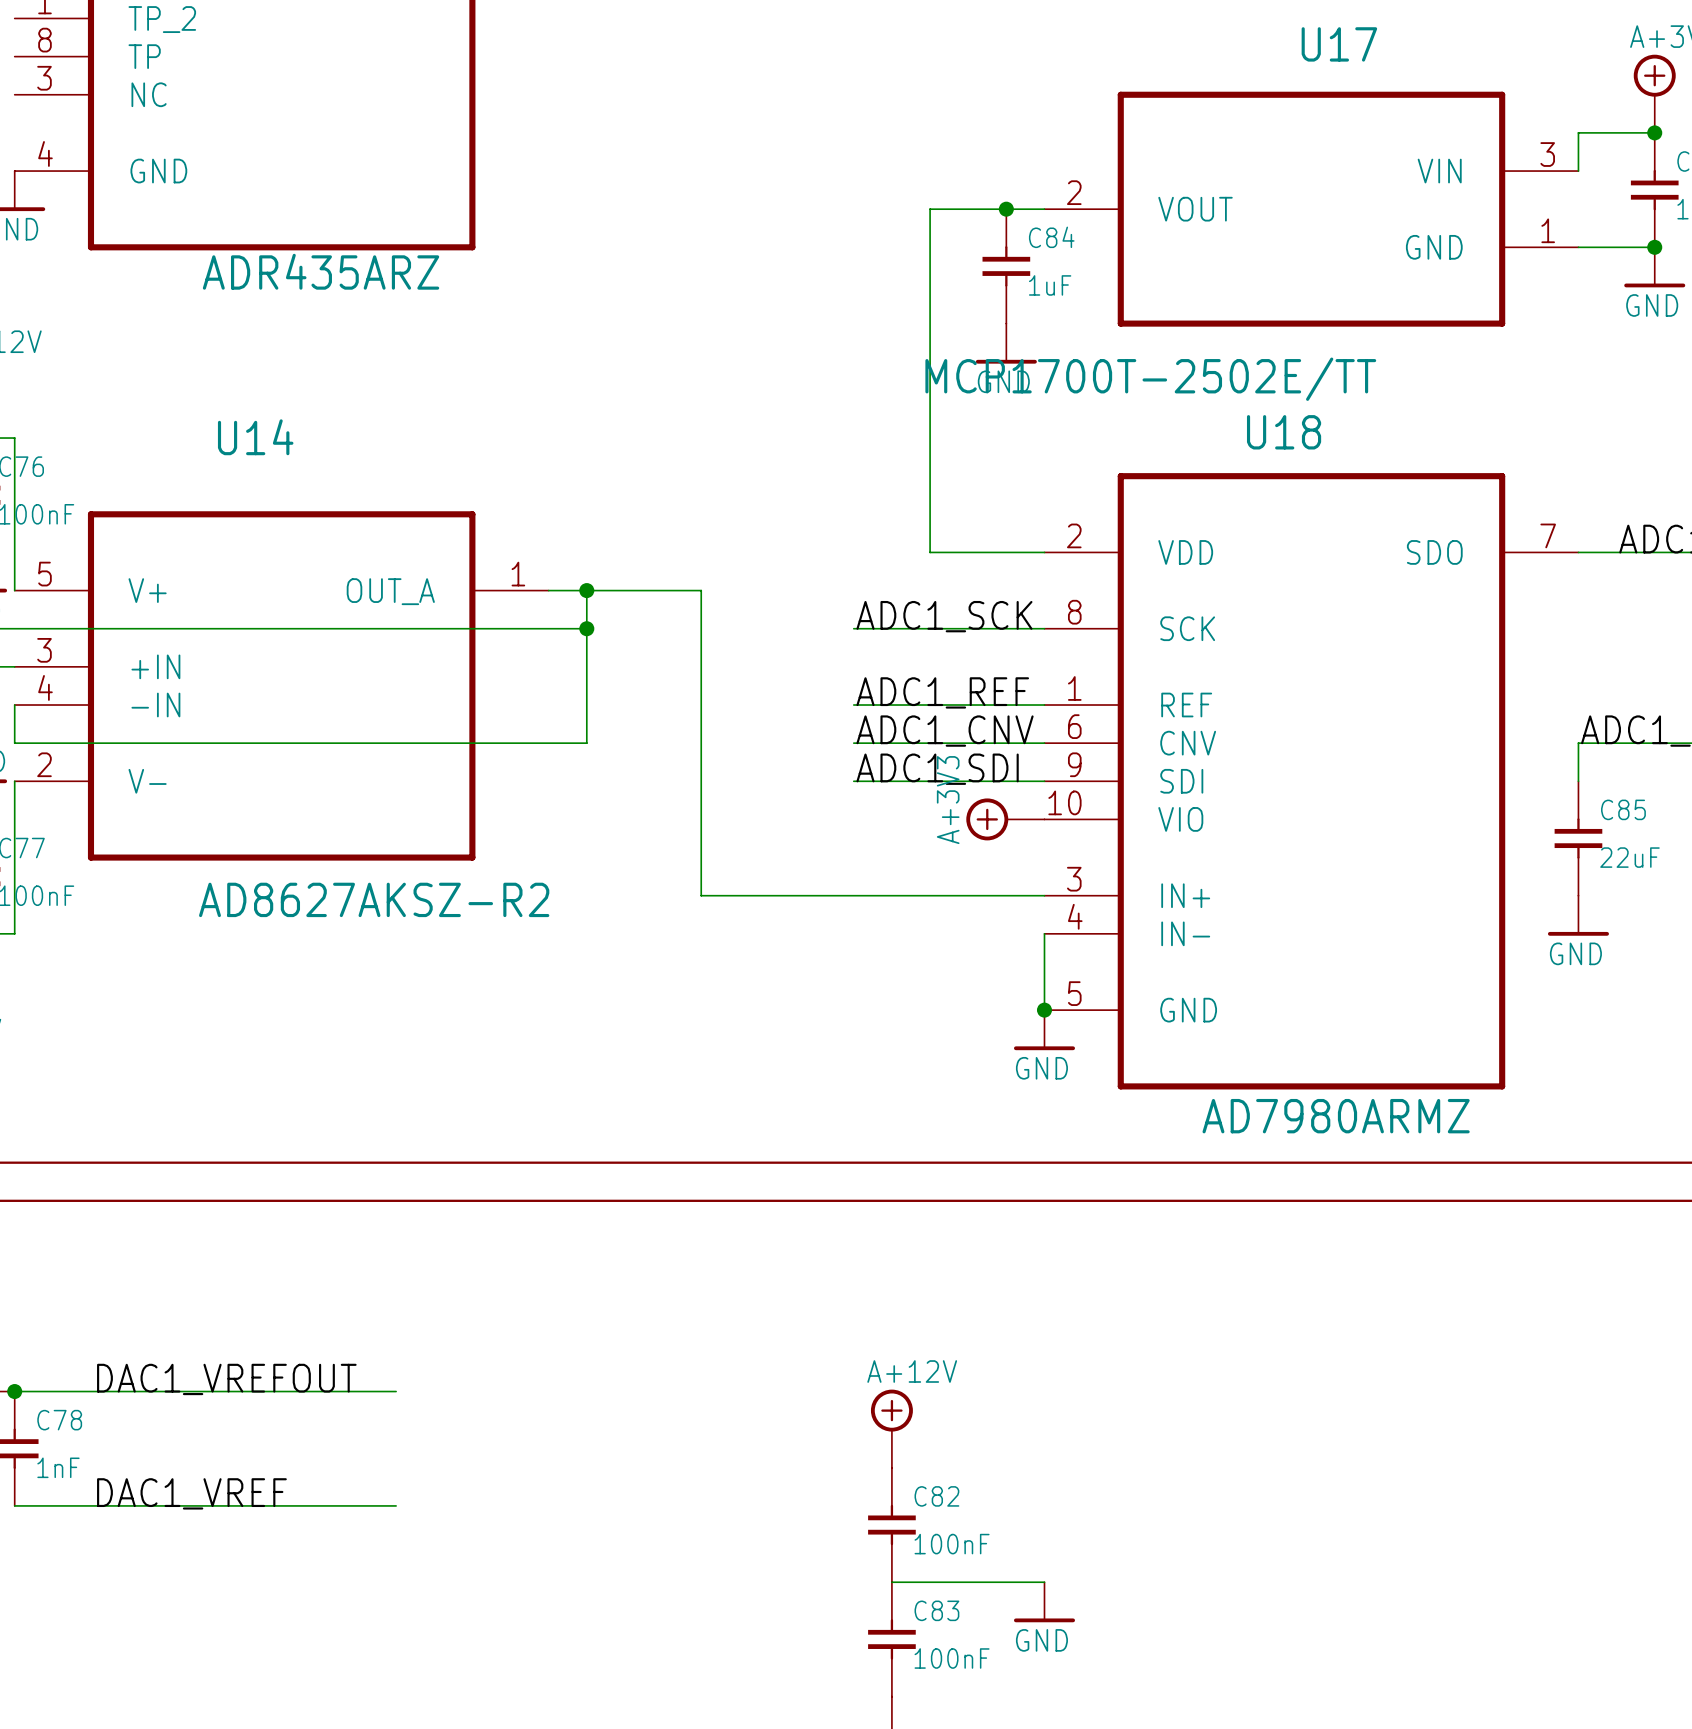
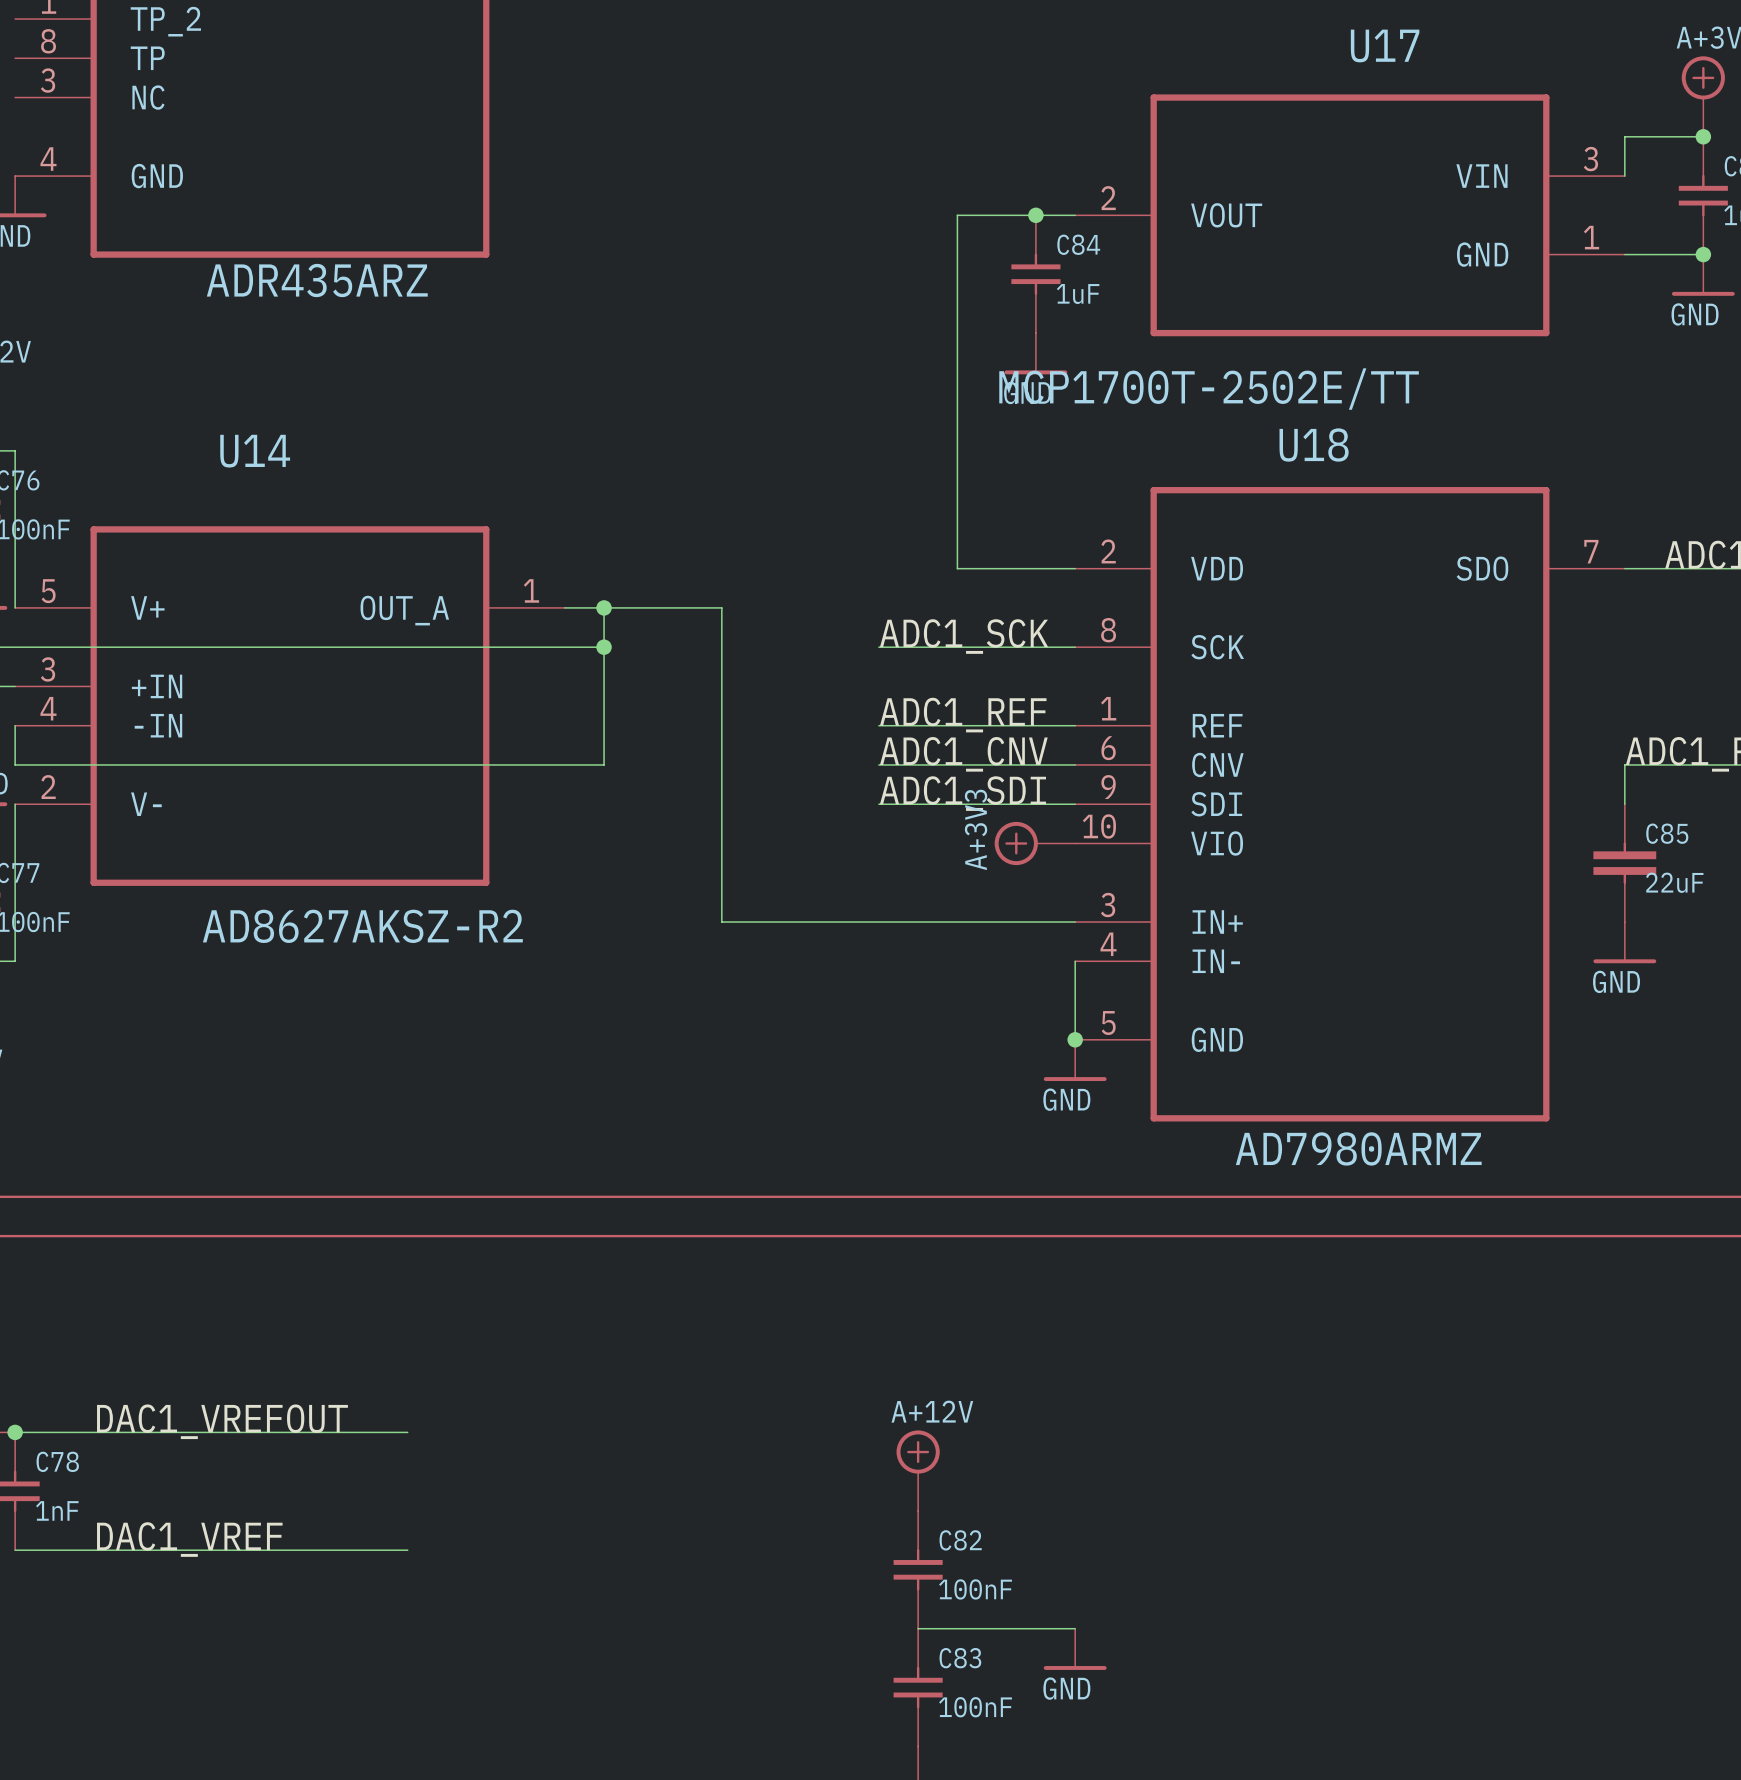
C85 symbol: [1554, 781, 1603, 896] -> [1593, 804, 1657, 923]

